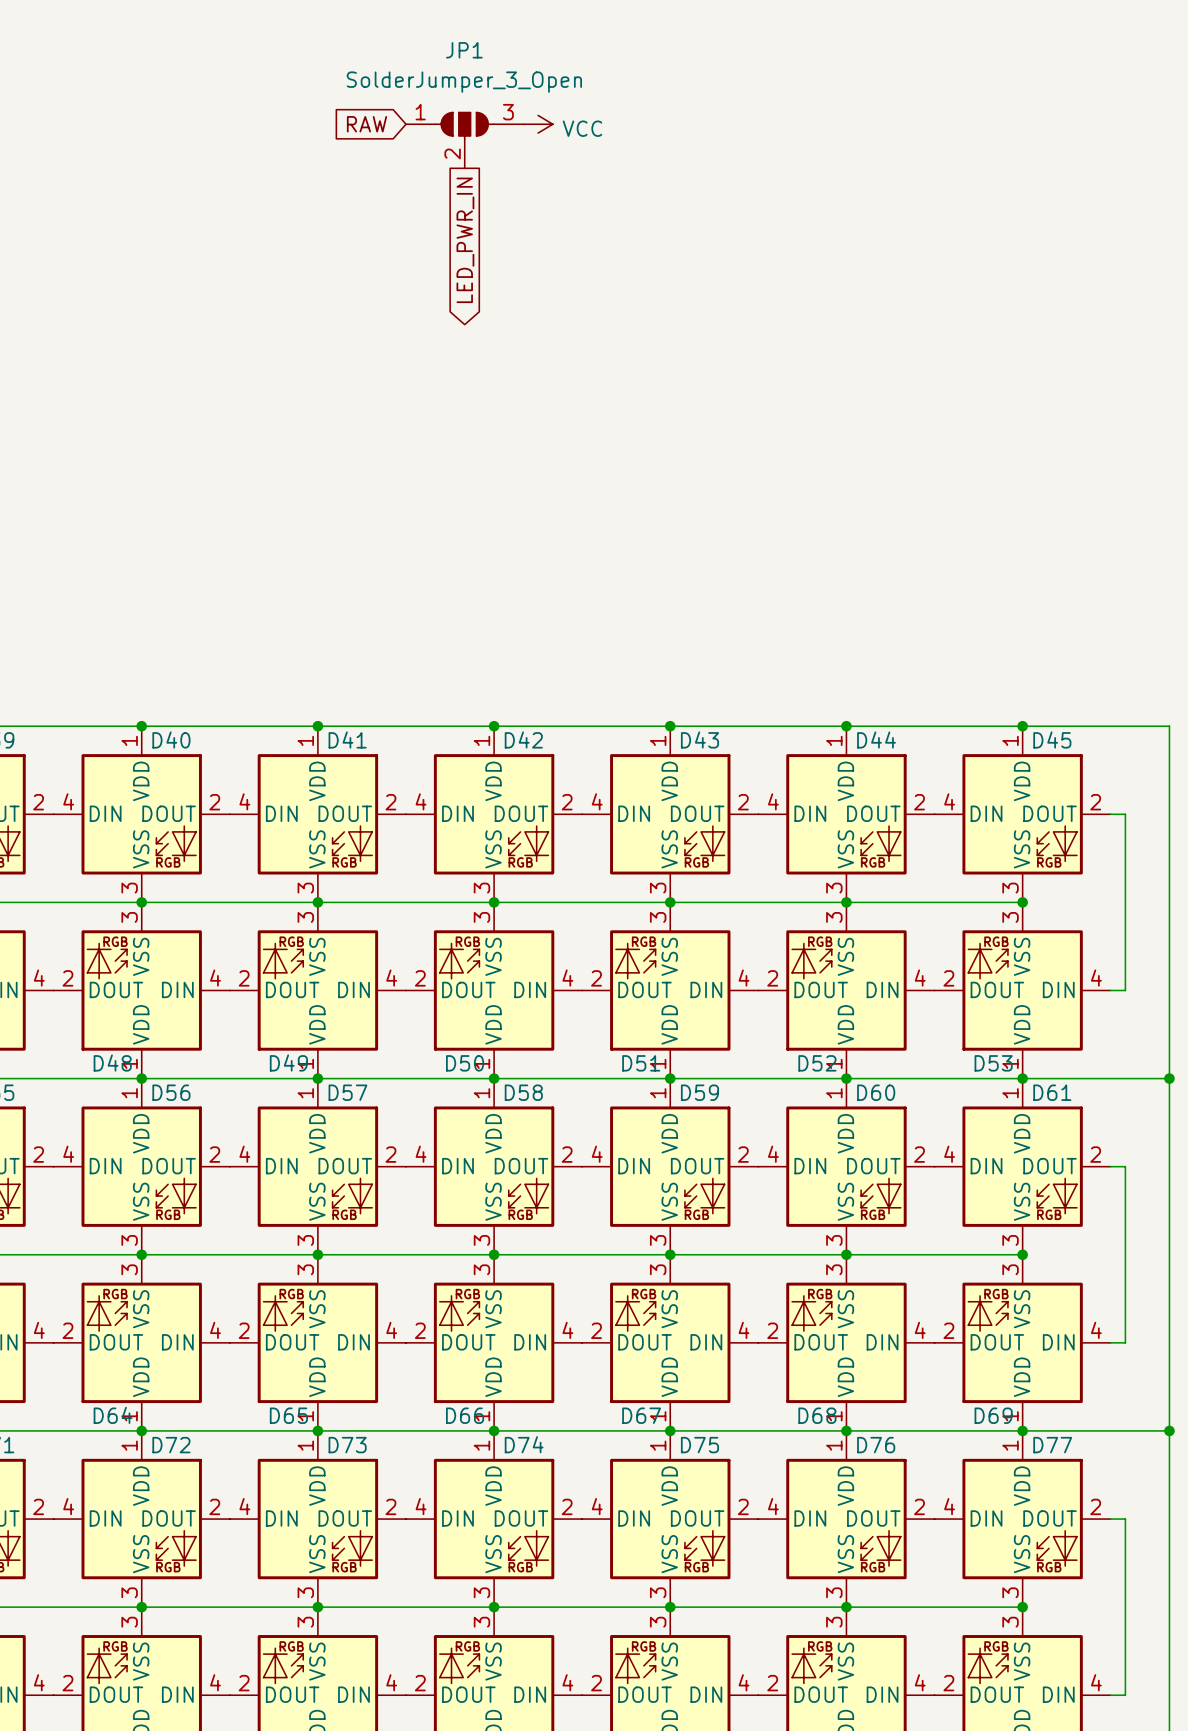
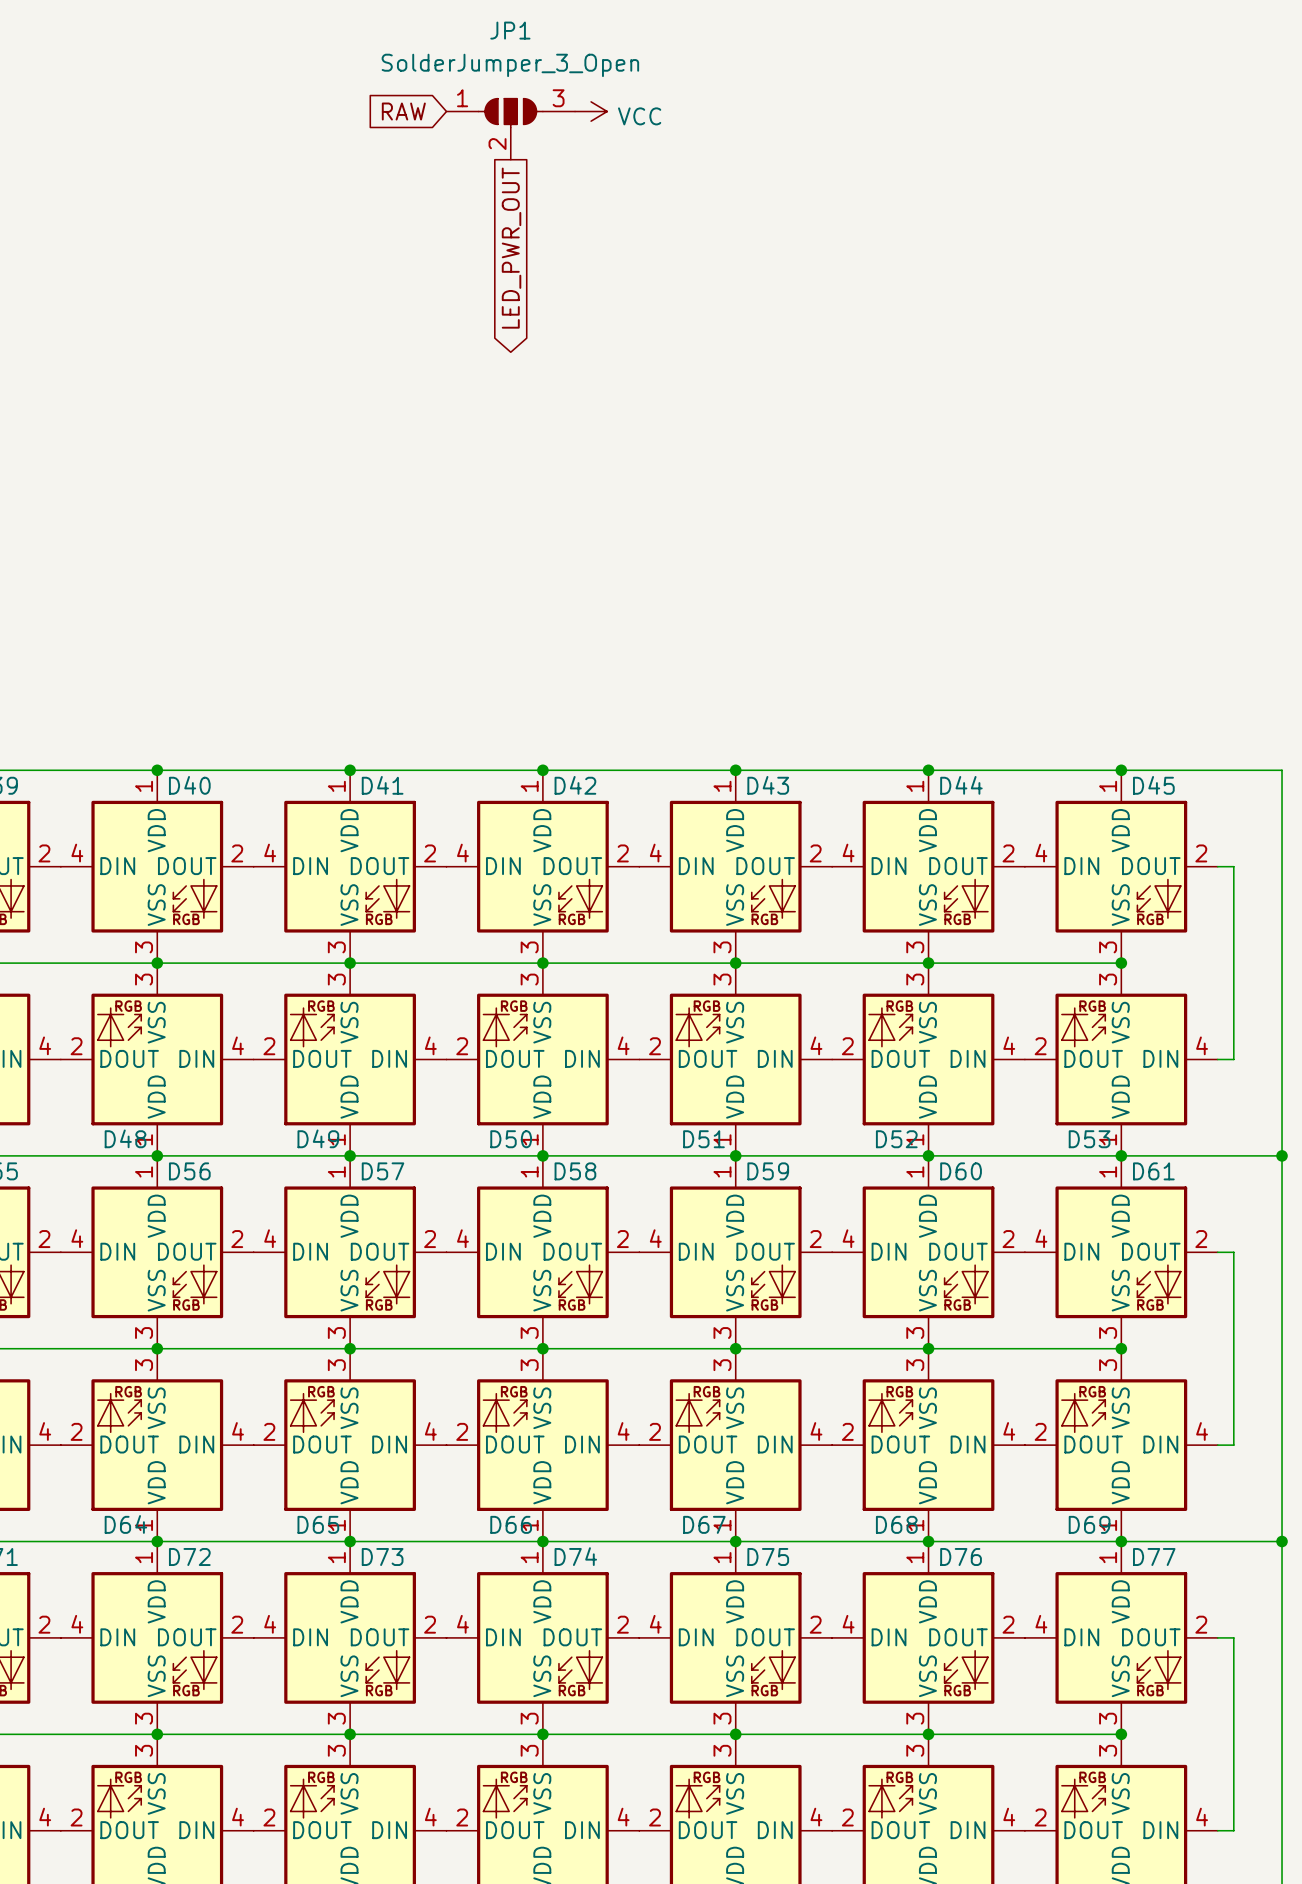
global label: LED_PWR_IN (465, 240) -> LED_PWR_OUT (511, 248)

